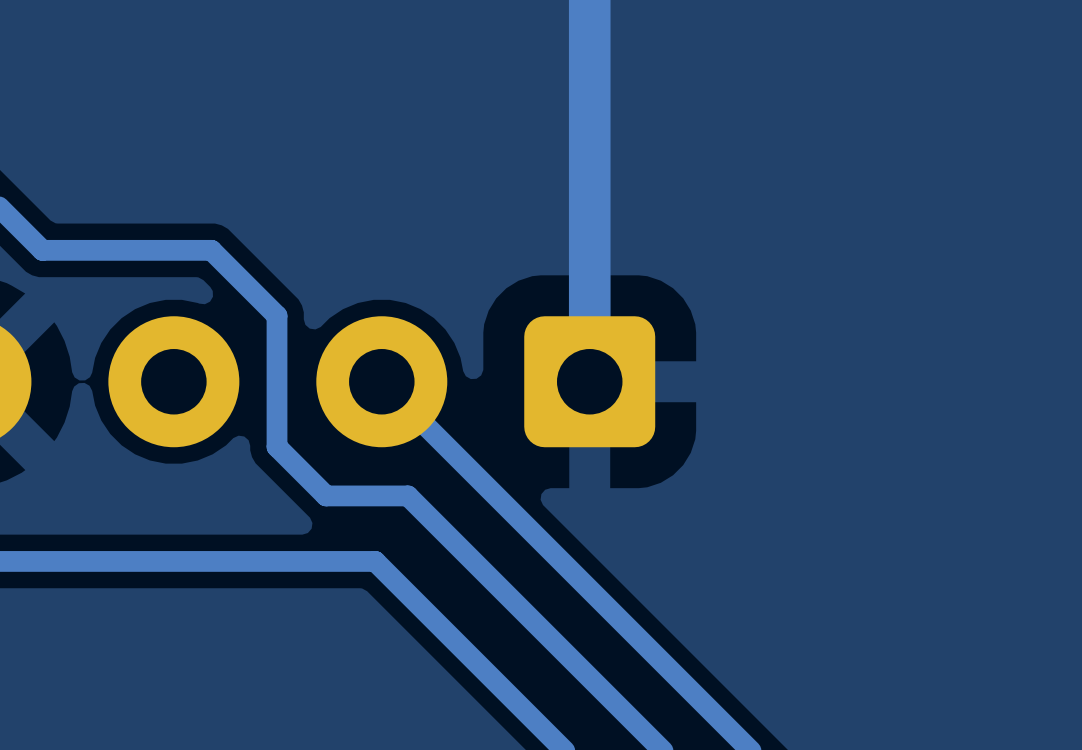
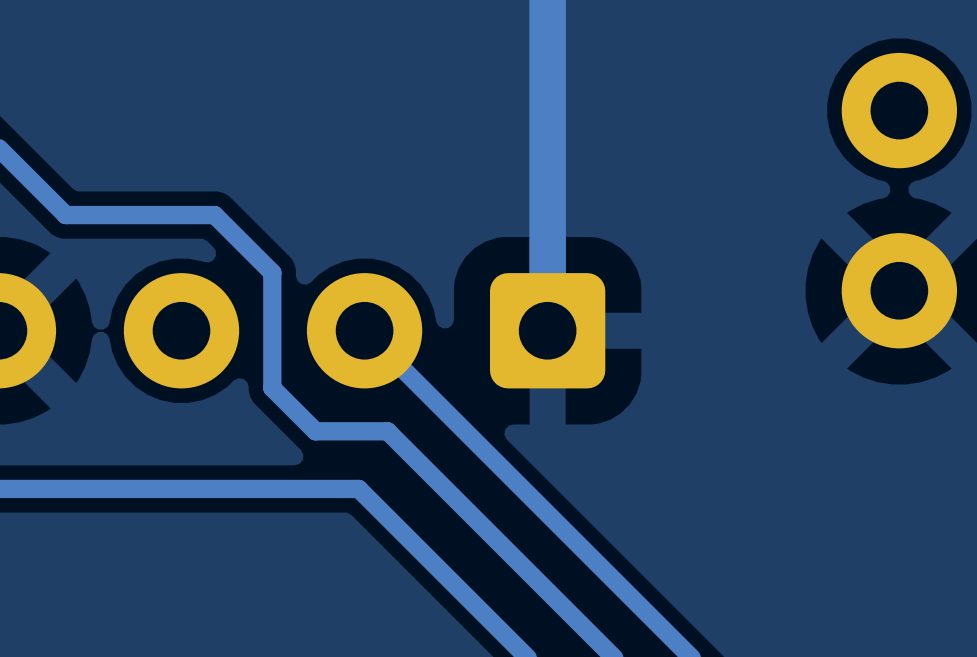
part: none -> (899, 200)

